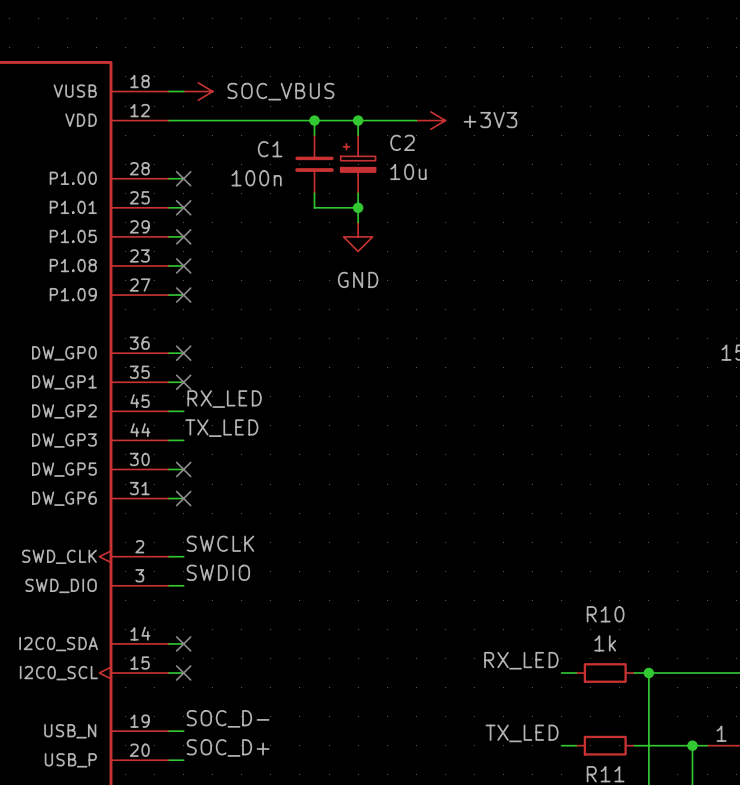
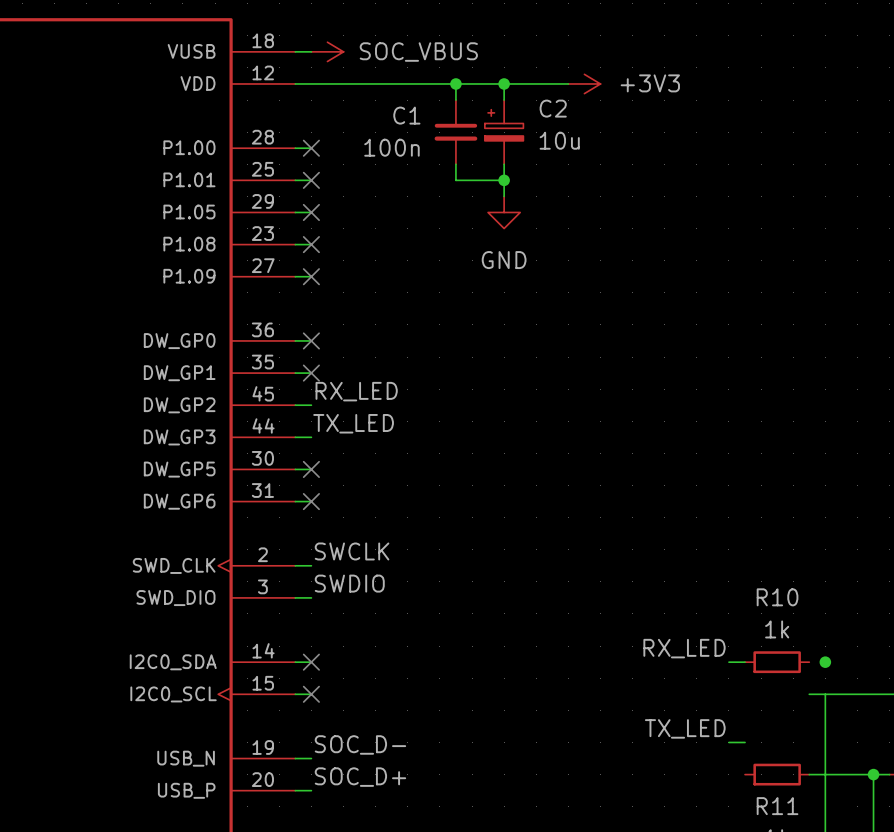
label position: RX_LED (521, 660) -> RX_LED (684, 648)
wire: (561, 673) (576, 673) -> (728, 662) (745, 662)
R10 position: (605, 673) -> (777, 662)
junction position: (648, 673) -> (825, 662)
label position: TX_LED (522, 733) -> TX_LED (685, 728)
wire: (561, 745) (576, 745) -> (728, 742) (745, 742)

